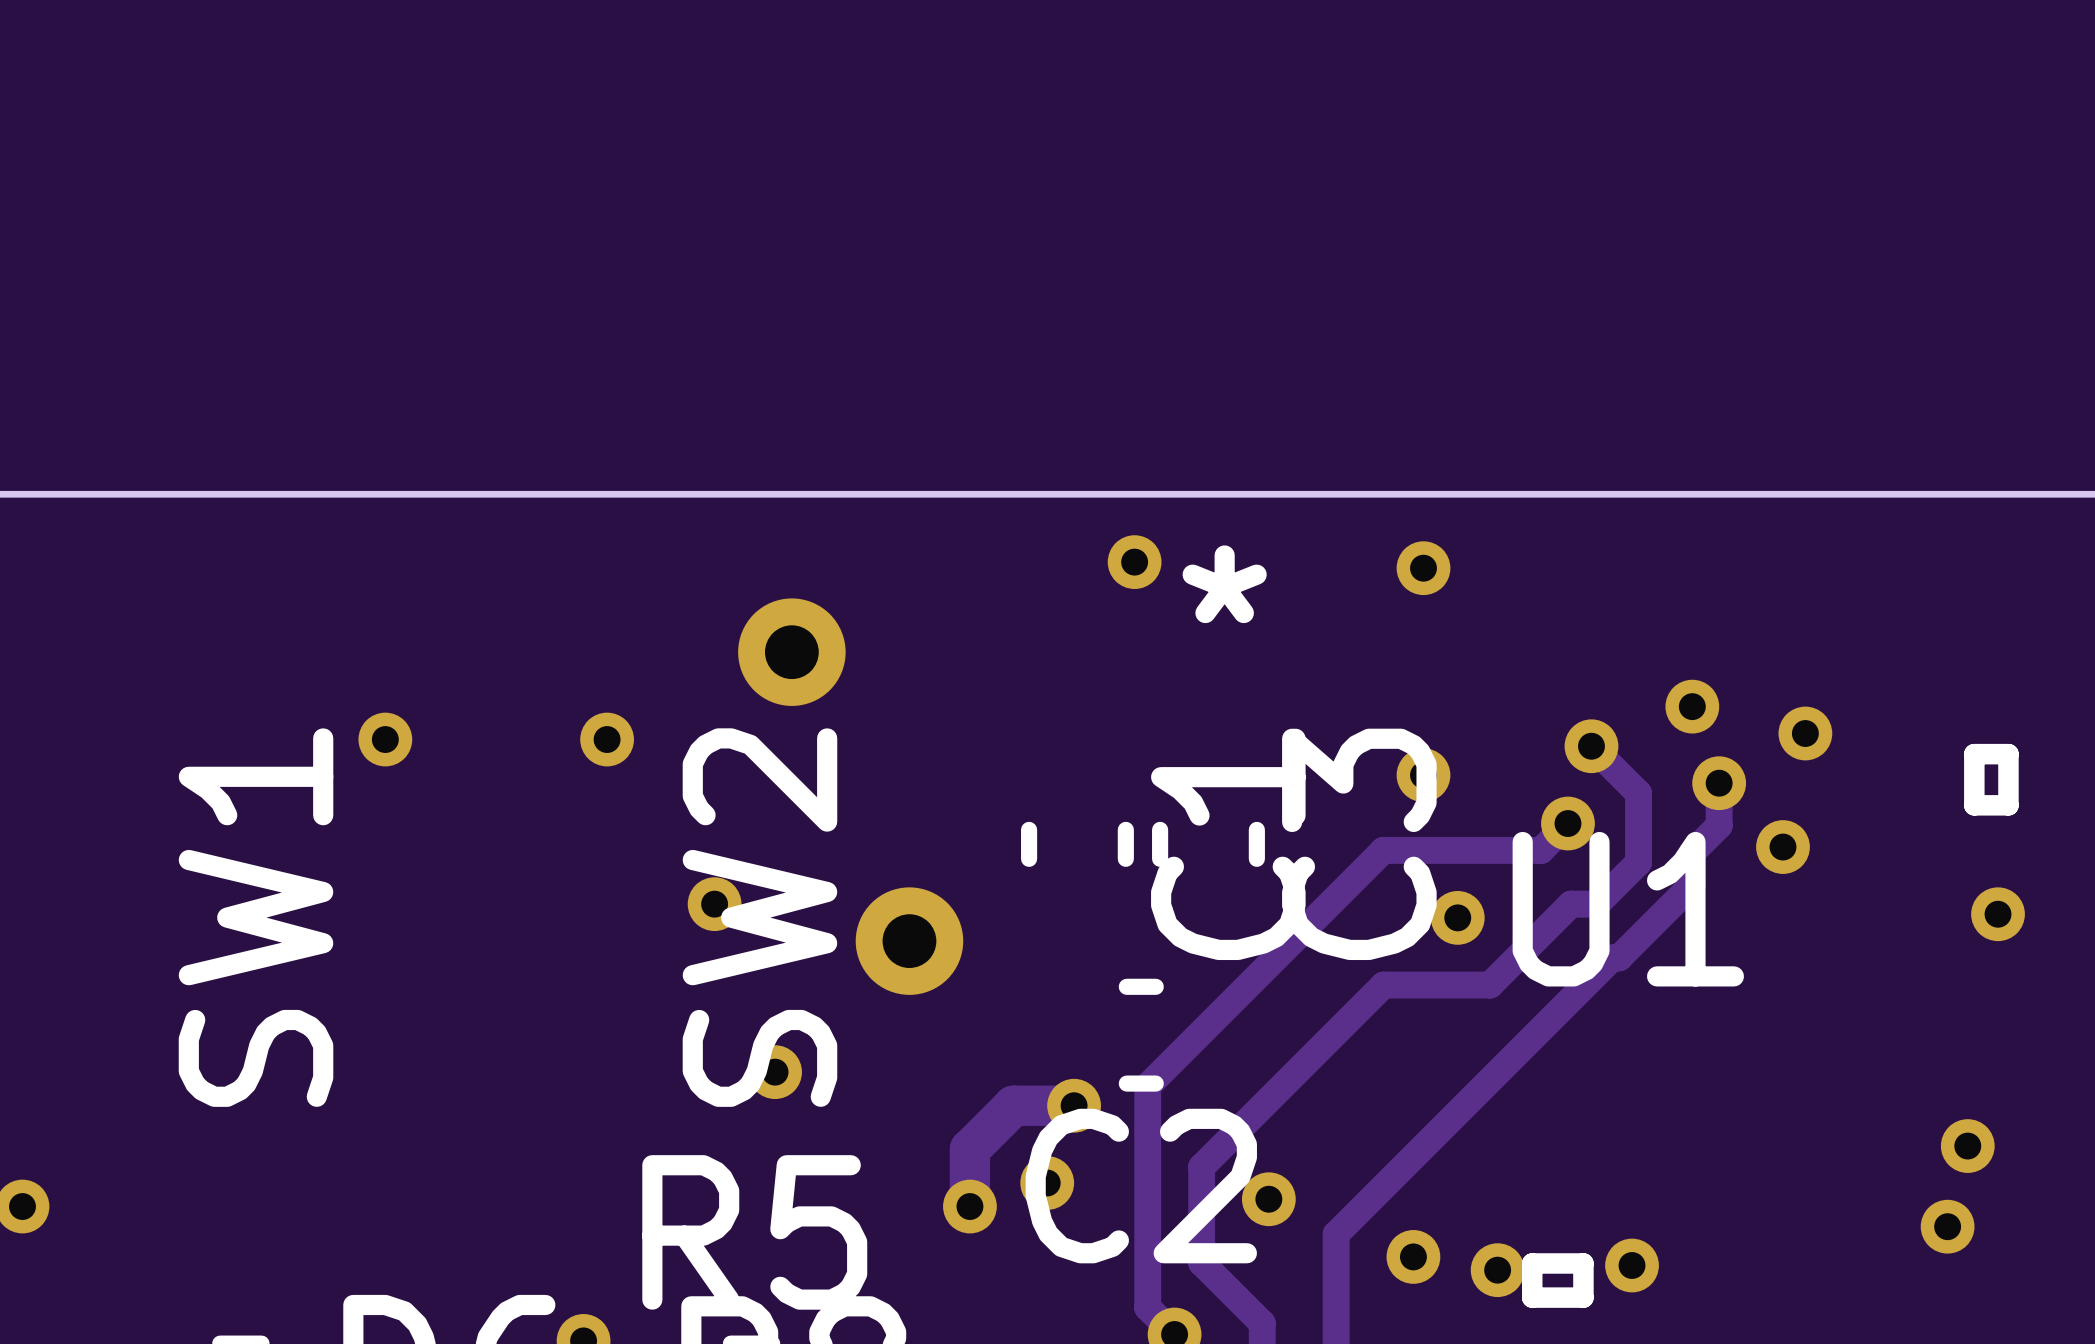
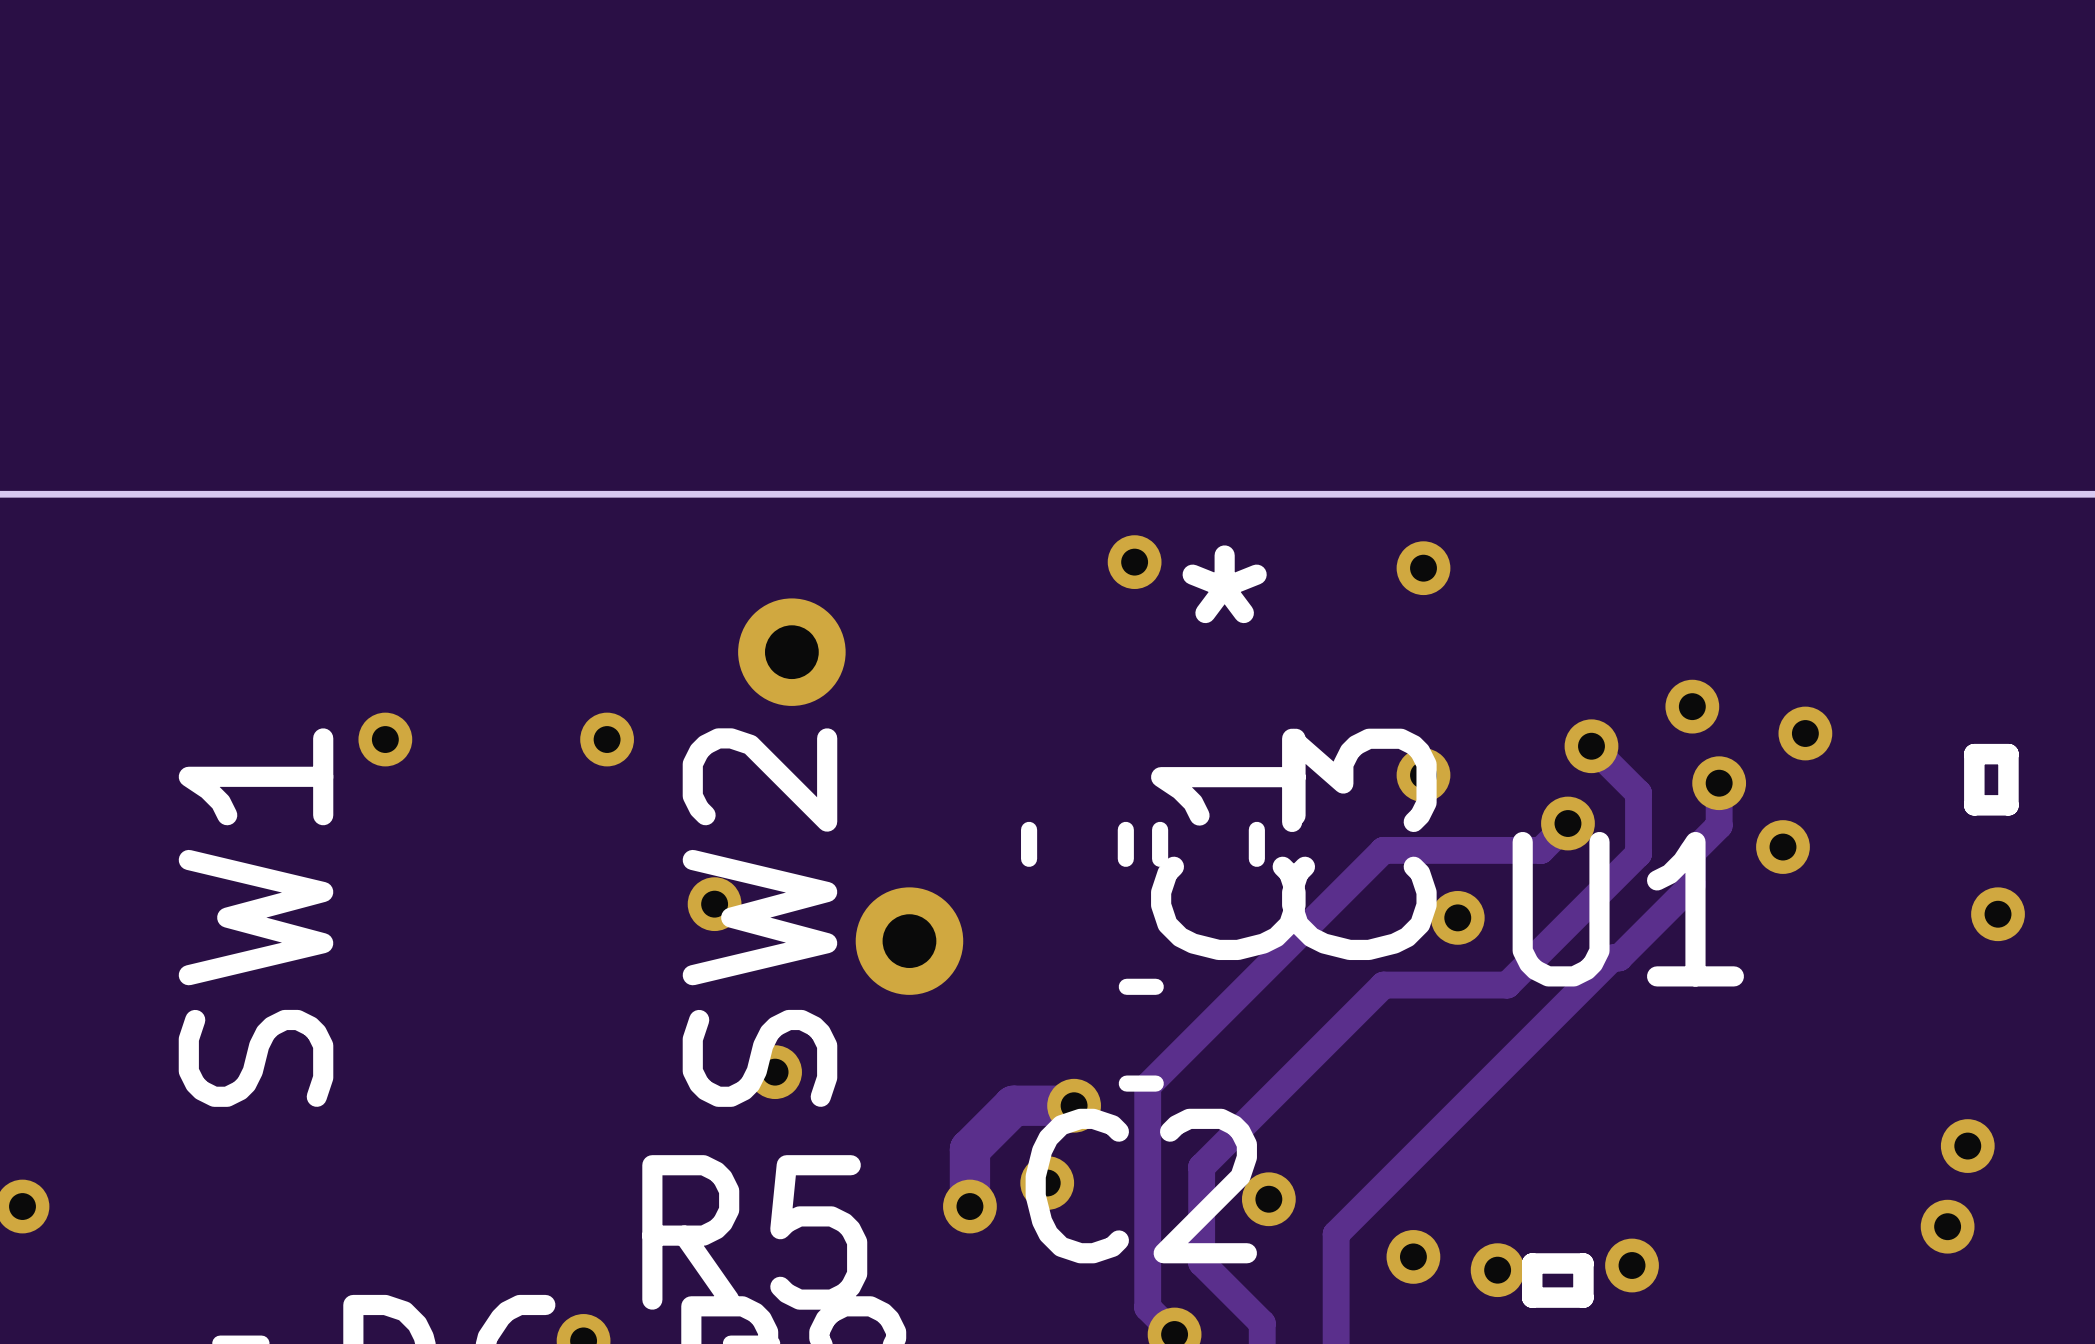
track: (1638, 853) (1638, 862) (1596, 904) (1570, 904) (1490, 985) -> (1638, 853) (1507, 985) (1490, 985)

